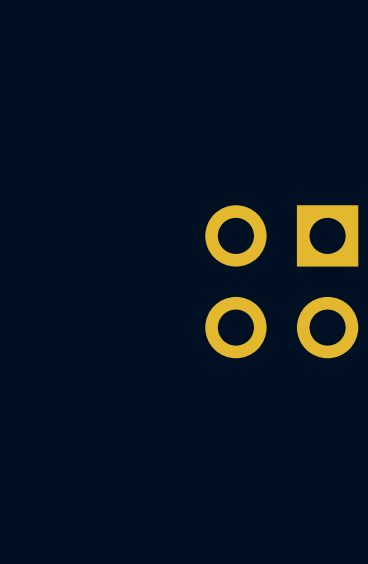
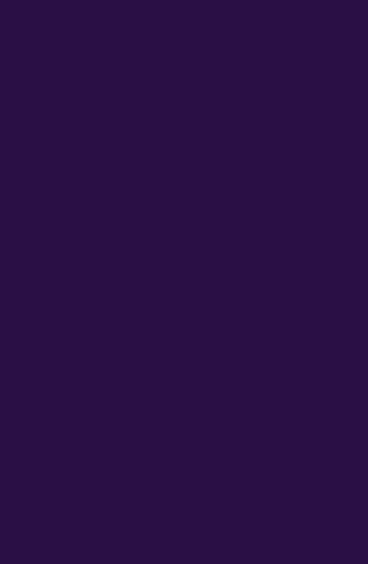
part: (281, 281) -> none

